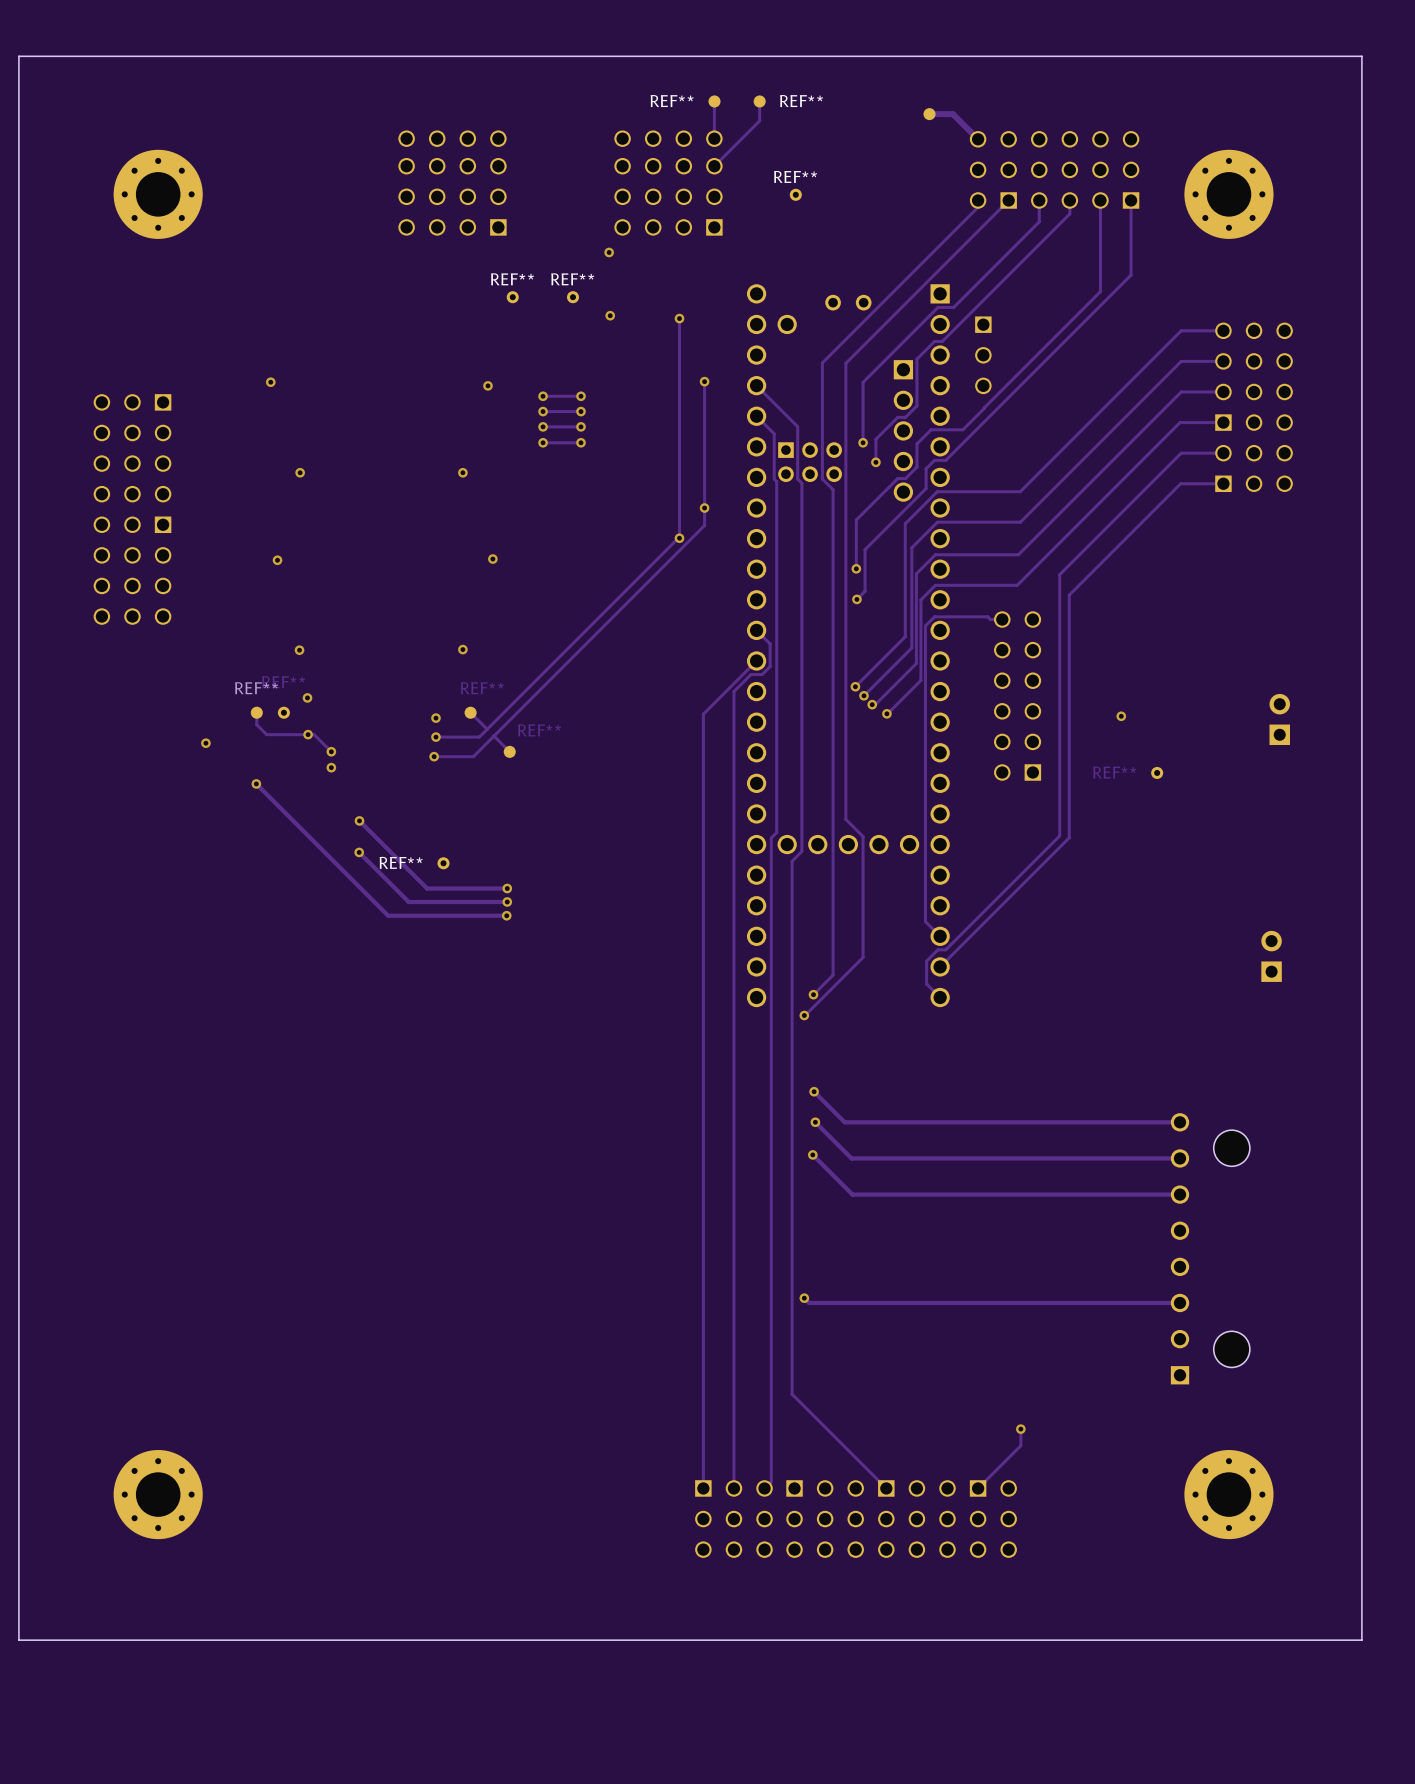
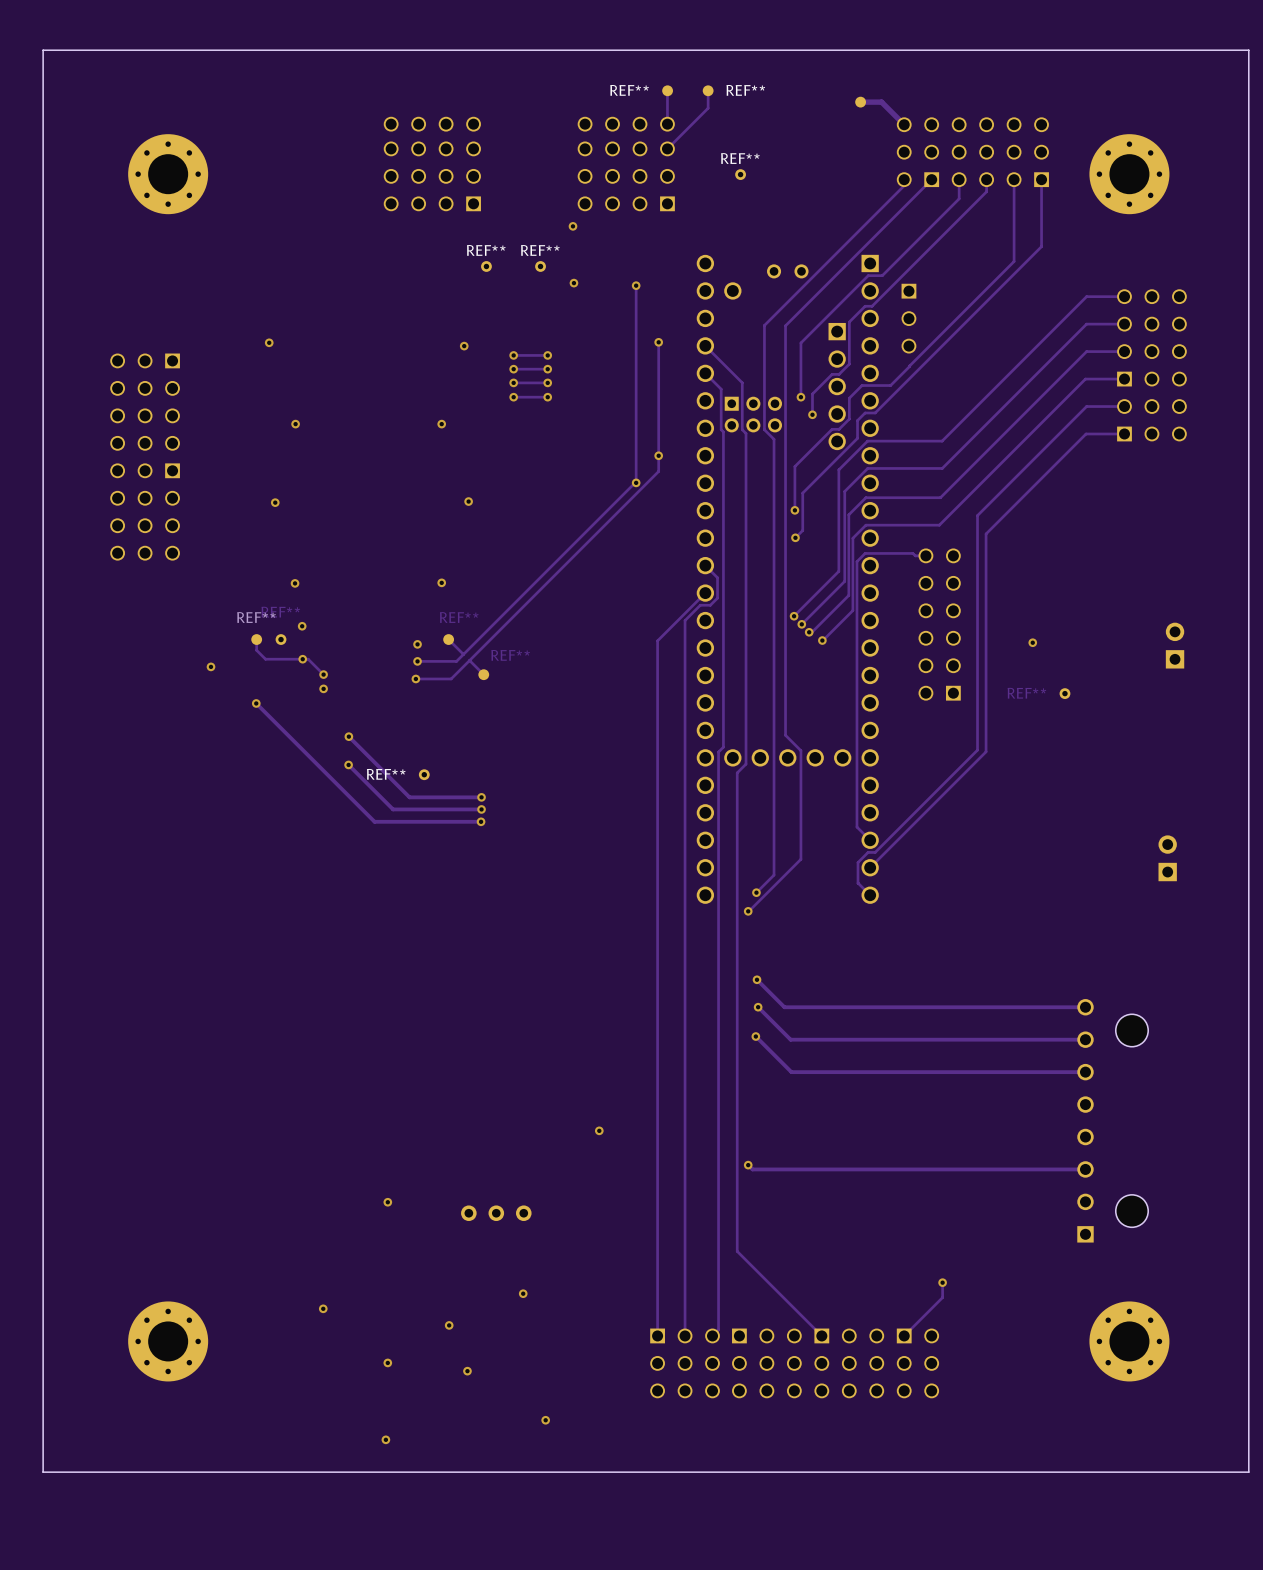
via: none -> (599, 1130)
via: none -> (387, 1202)
part: none -> (496, 1213)
via: none -> (523, 1293)
via: none -> (323, 1308)
via: none -> (449, 1325)
via: none -> (387, 1362)
via: none -> (467, 1371)
via: none -> (545, 1420)
via: none -> (385, 1439)

